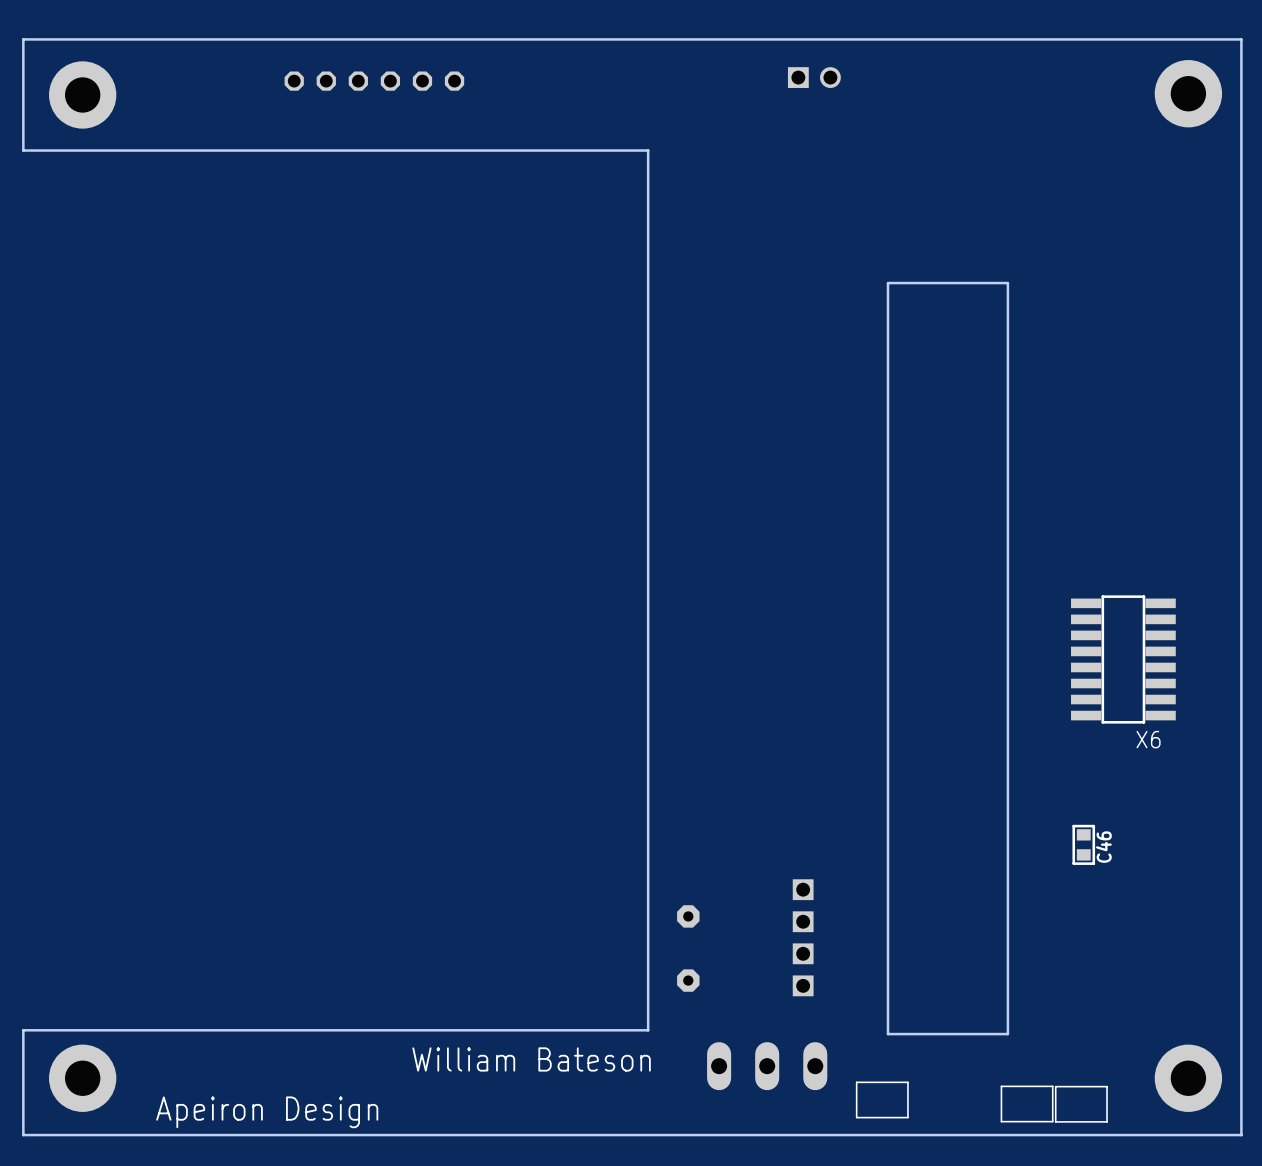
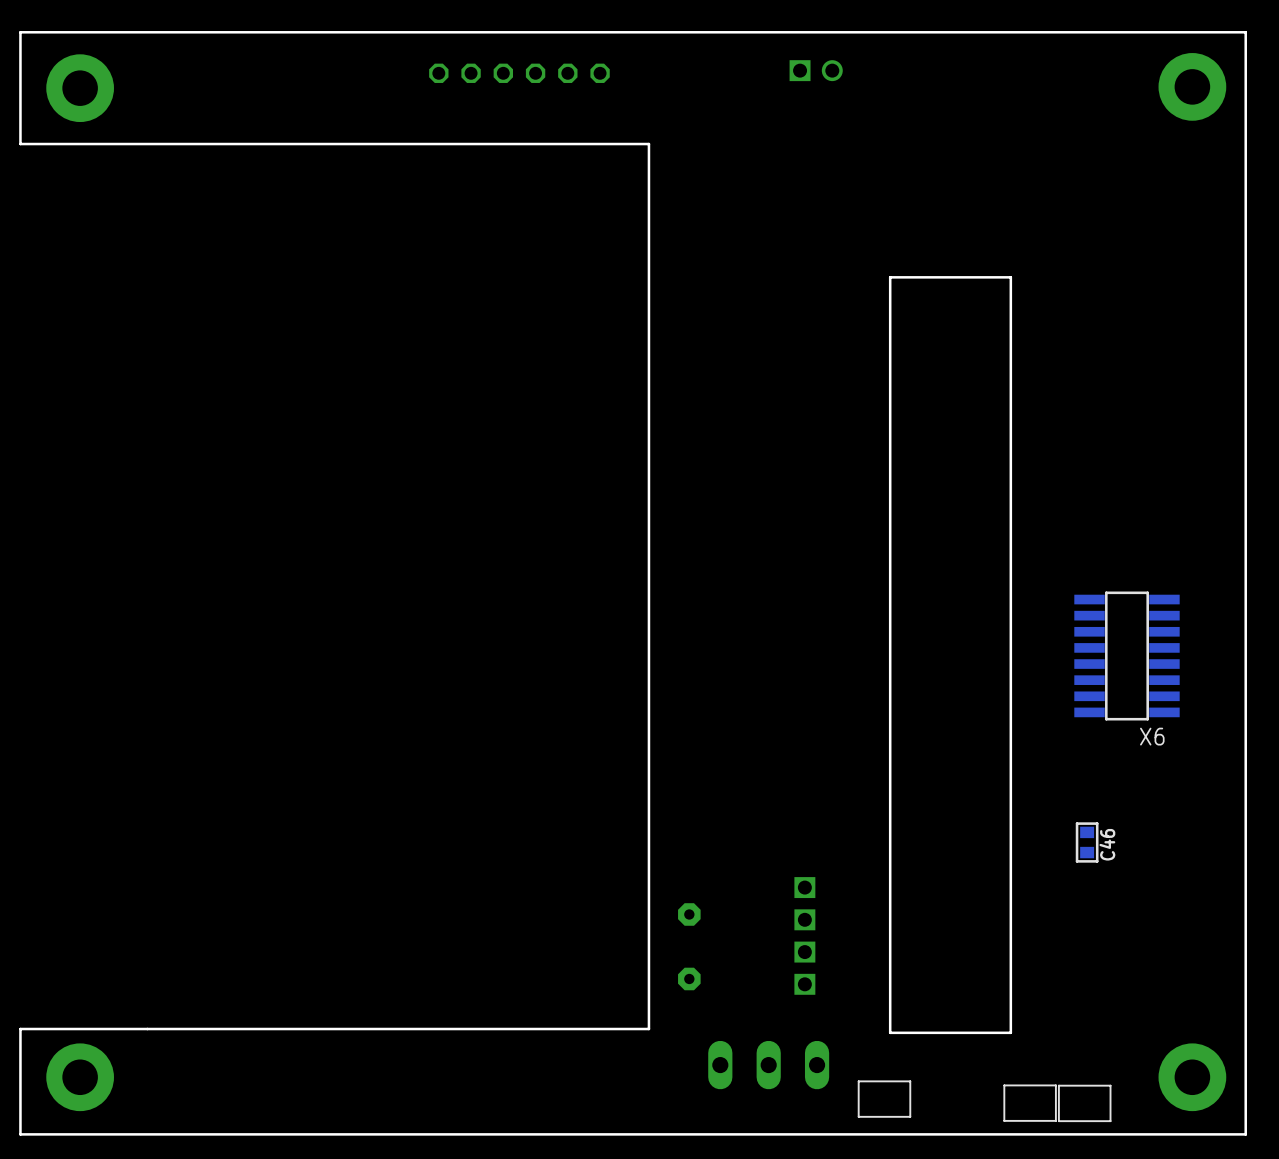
part position: (374, 81) -> (519, 73)
text: William Bateson (531, 1059) -> none
text: Apeiron Design (267, 1112) -> none

